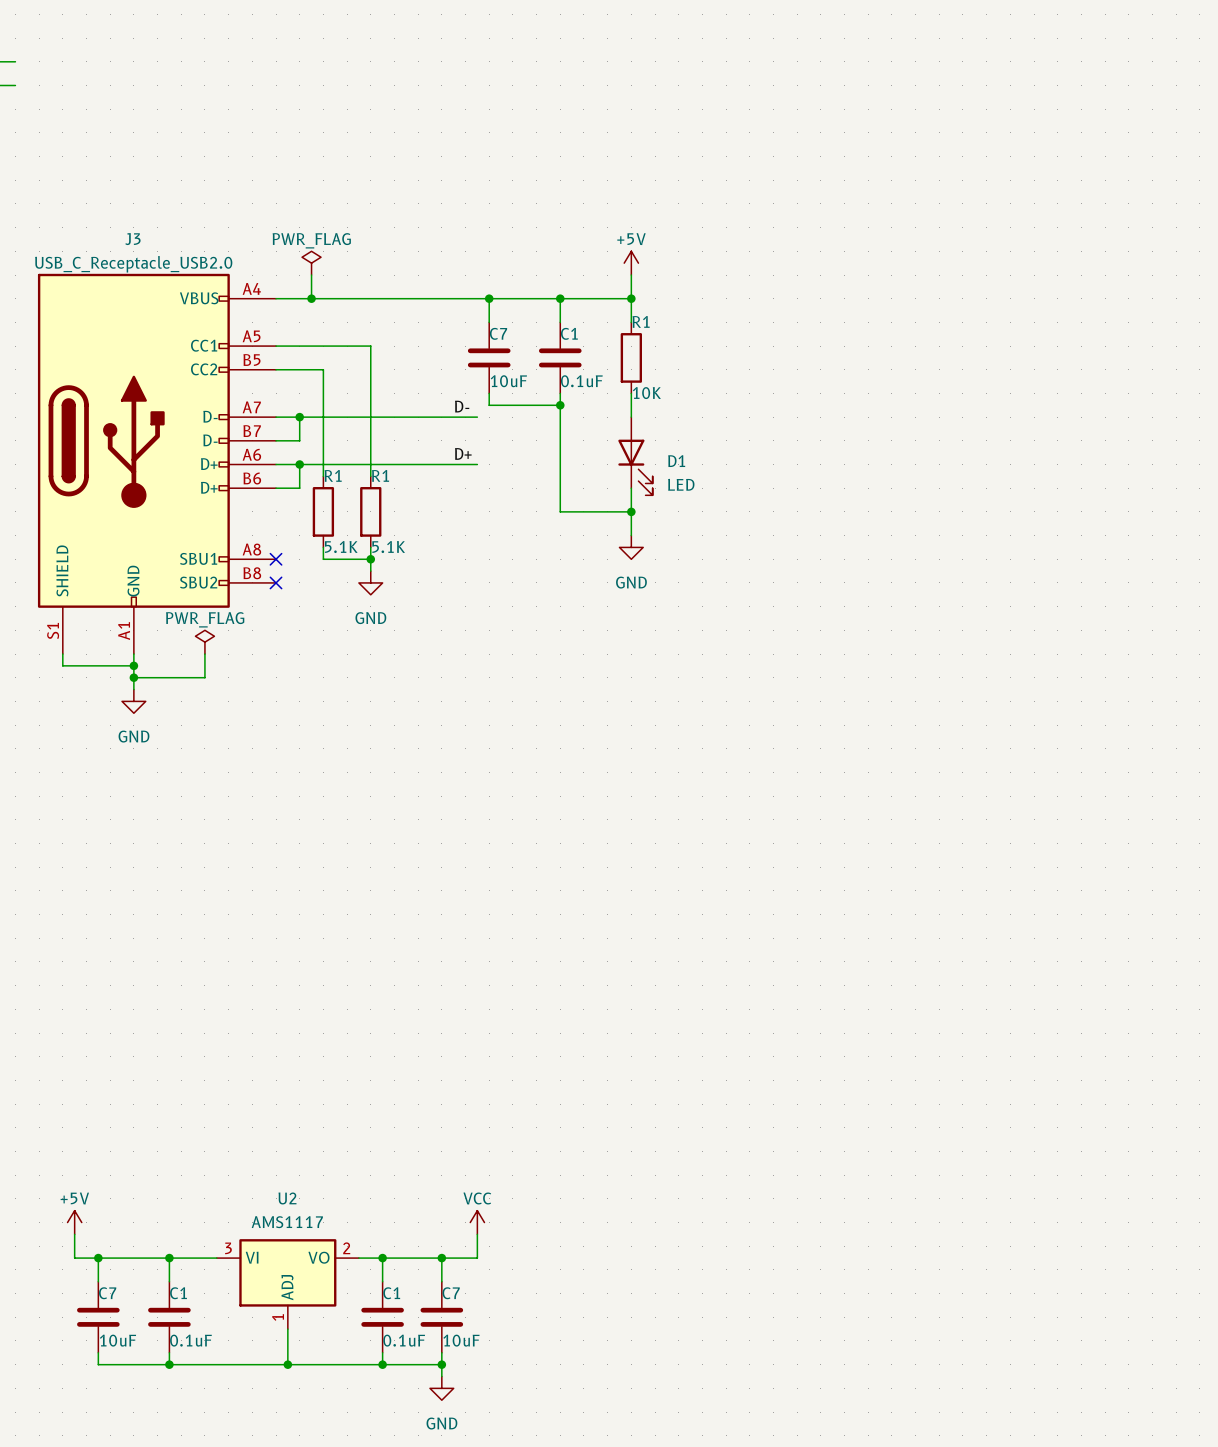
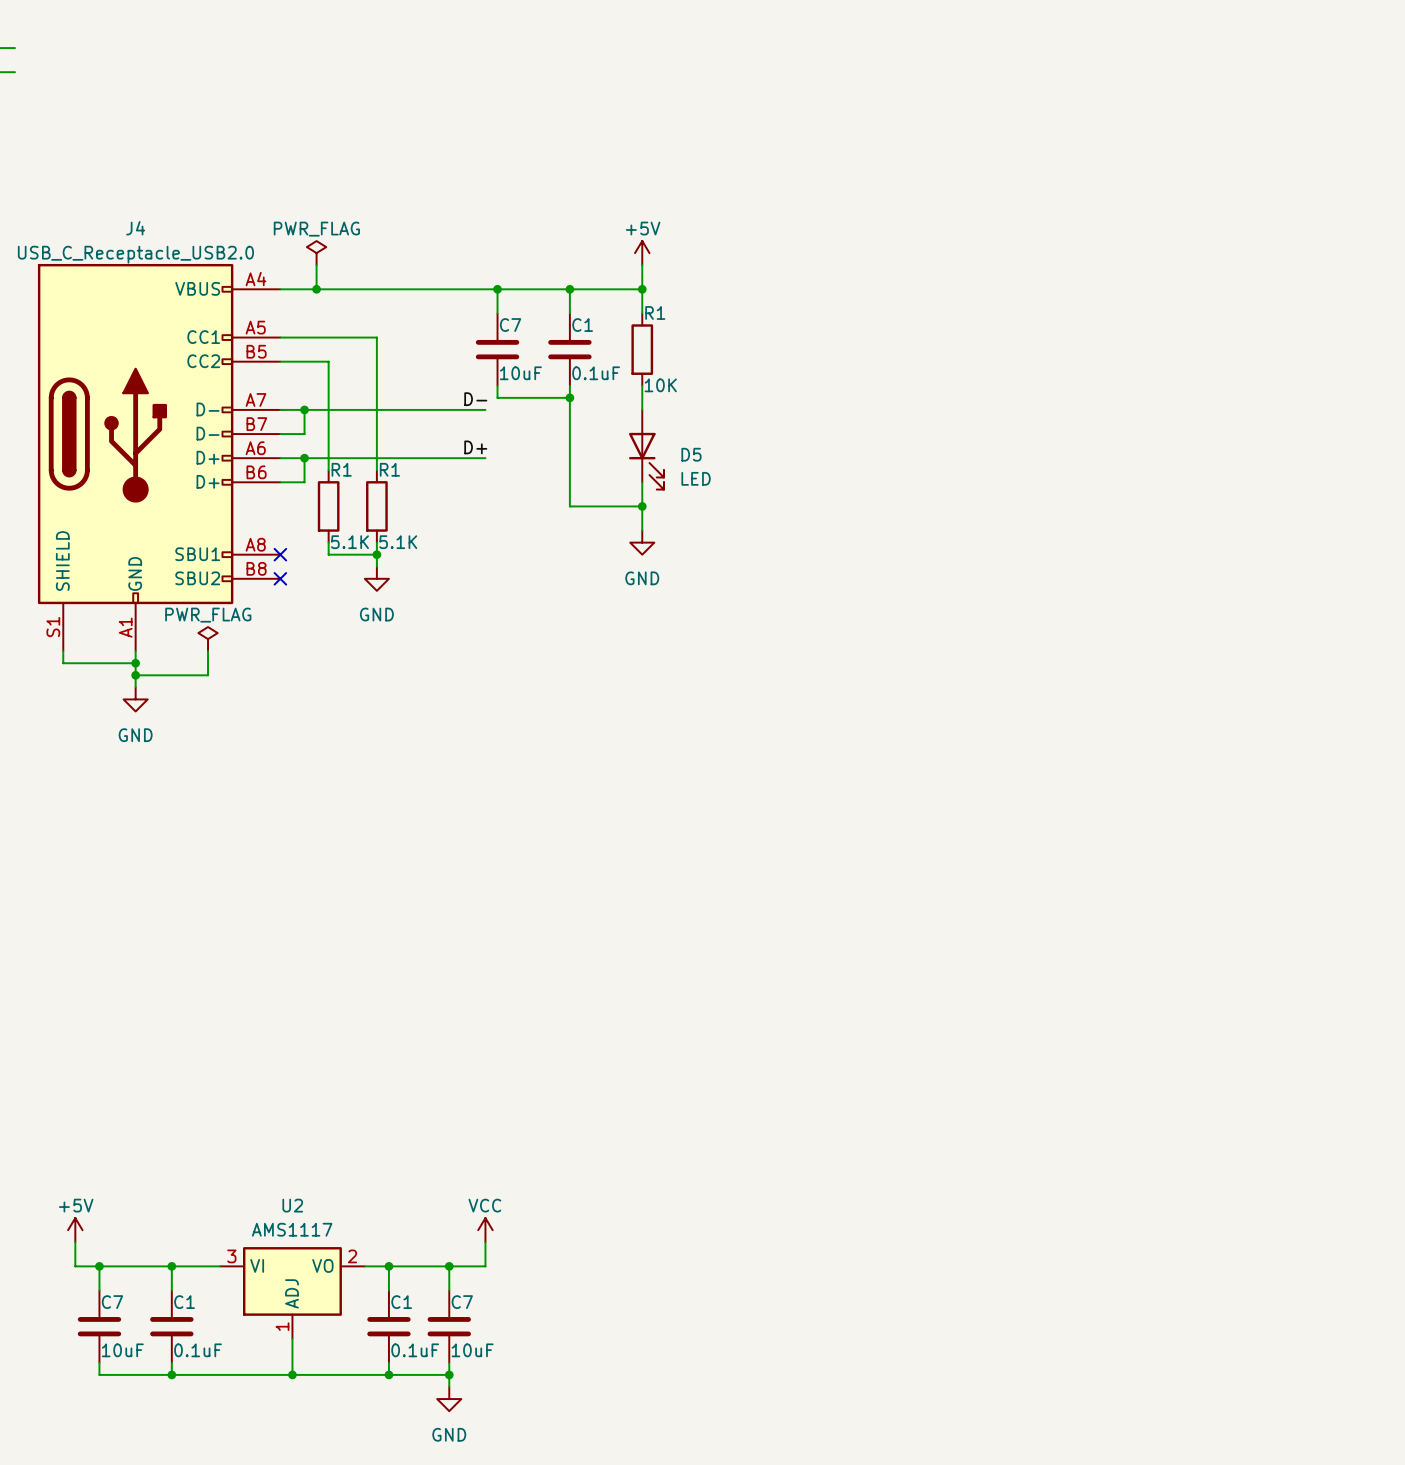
J3 name: J3 (132, 239) -> J4 (135, 228)
D1 name: D1 (676, 461) -> D5 (691, 454)

